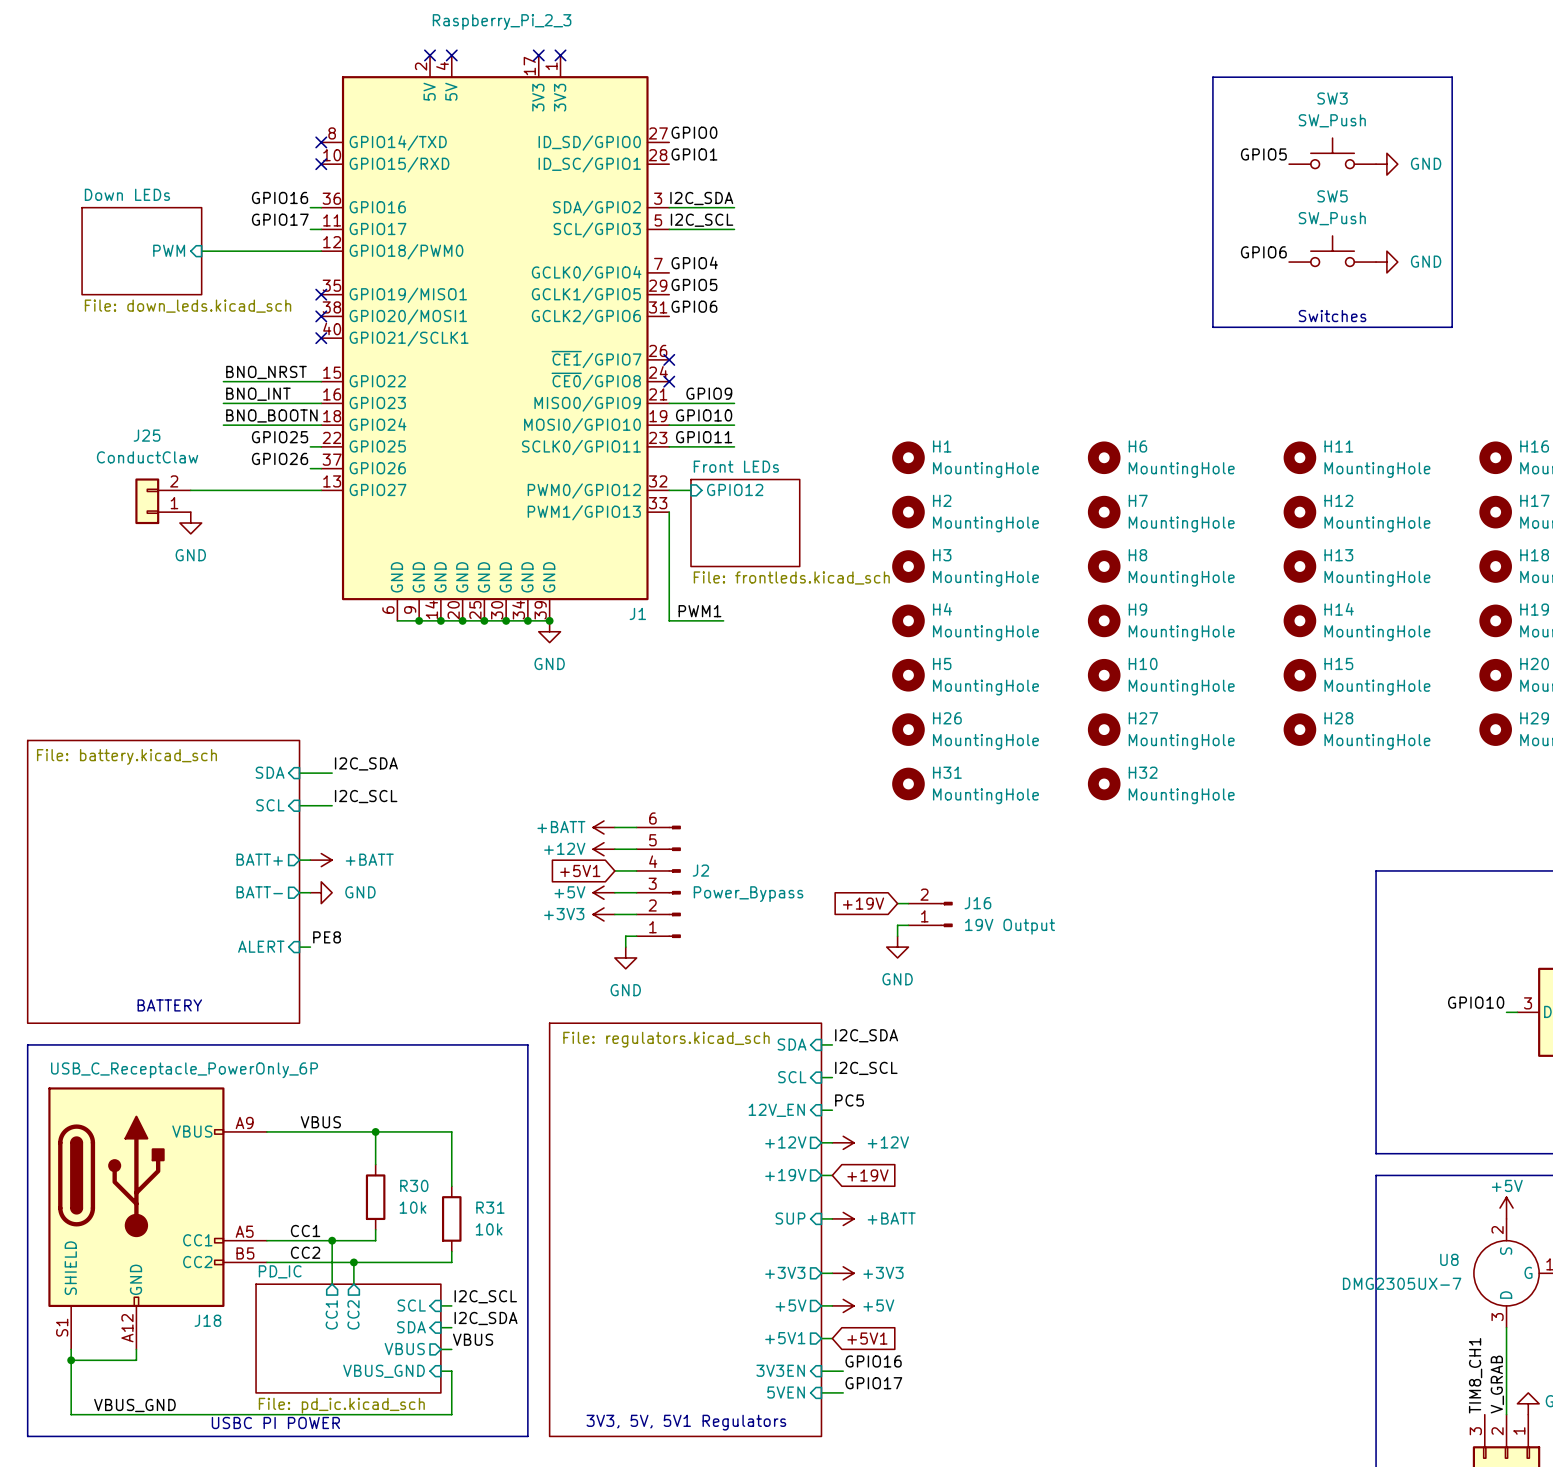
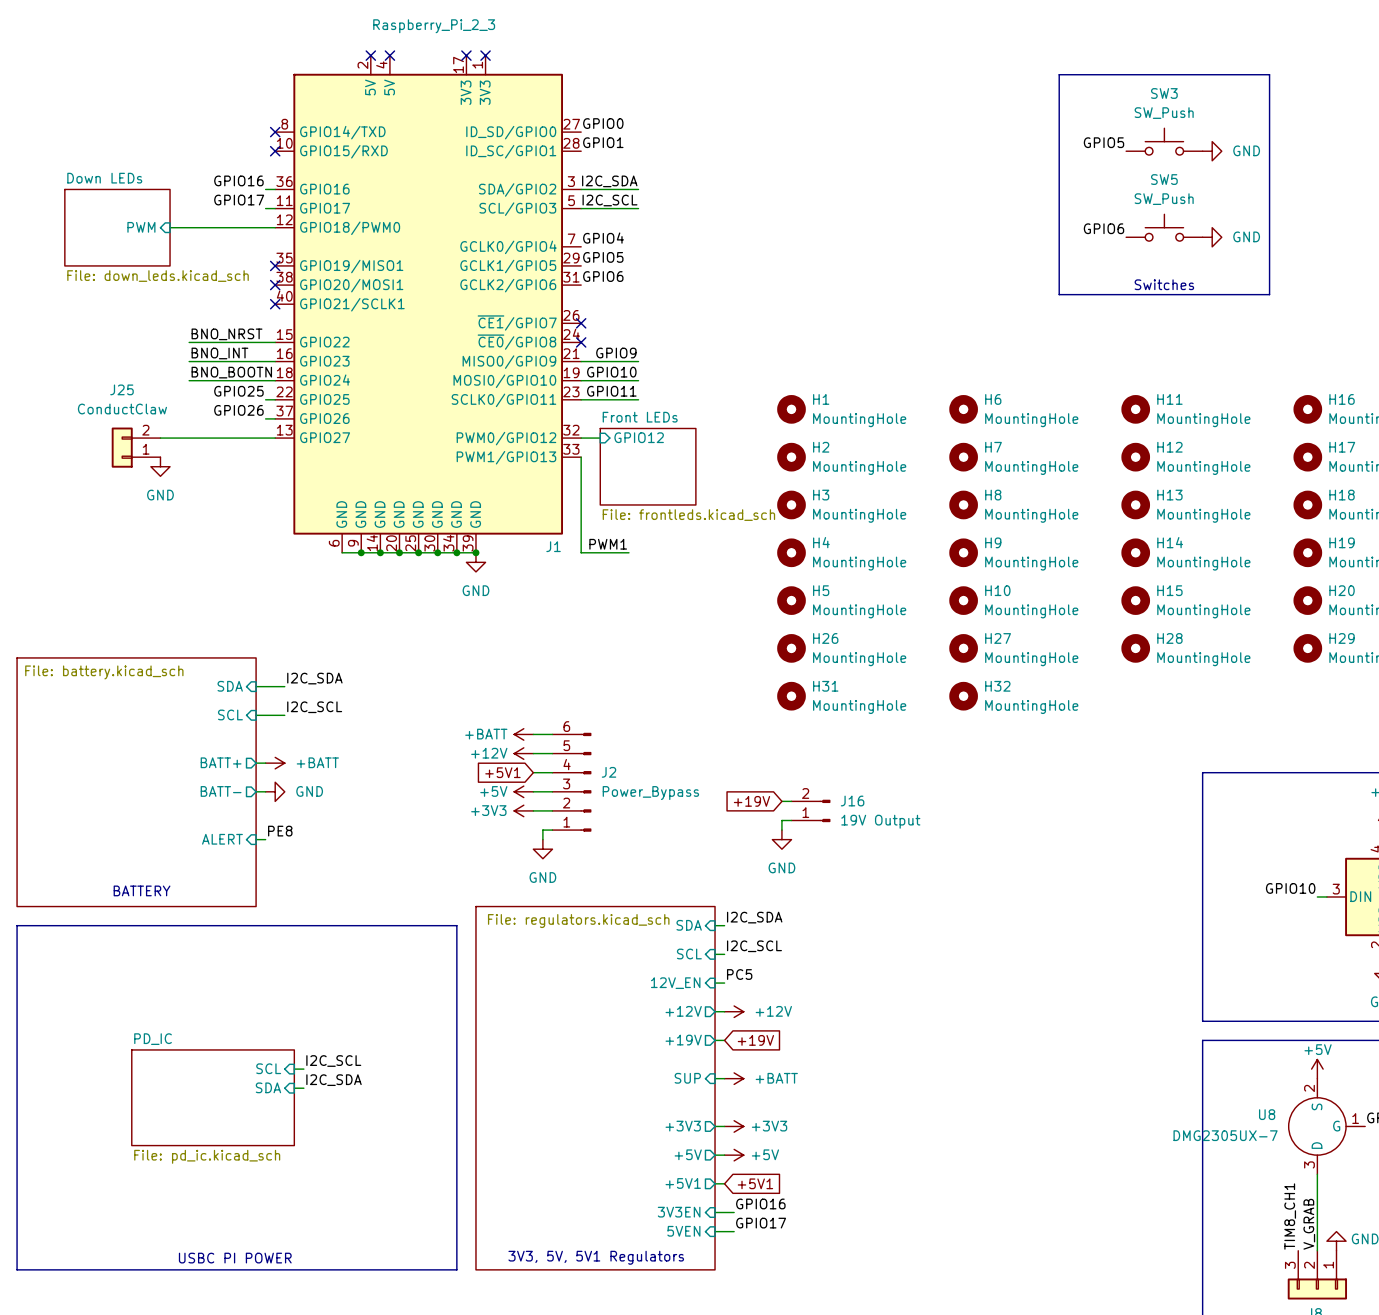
label: VBUS (320, 1122) -> none
wire: (266, 1131) (451, 1131) (451, 1186) -> none
wire: (375, 1131) (375, 1164) -> none
junction: (375, 1131) -> none
R30: 10k (375, 1197) -> none
J18: USB_C_Receptacle_PowerOnly_6P (157, 1218) -> none
R31: 10k (451, 1218) -> none
wire: (375, 1229) (375, 1240) (266, 1240) -> none
label: CC1 (305, 1230) -> none
wire: (332, 1240) (332, 1284) -> none
junction: (332, 1240) -> none
wire: (451, 1251) (451, 1262) (266, 1262) -> none
label: CC2 (305, 1252) -> none
wire: (353, 1262) (353, 1284) -> none
junction: (353, 1262) -> none
label position: I2C_SCL (485, 1296) -> I2C_SCL (333, 1061)
sheet pin position: SCL (411, 1305) -> SCL (268, 1068)
wire: (440, 1305) (451, 1305) -> (294, 1069) (303, 1069)
sheet pin: CC1 (331, 1314) -> none
sheet pin: CC2 (353, 1314) -> none
label position: I2C_SDA (486, 1318) -> I2C_SDA (334, 1080)
sheet pin position: SDA (411, 1327) -> SDA (268, 1087)
wire: (440, 1327) (451, 1327) -> (294, 1088) (303, 1088)
sheet PD_IC position: (348, 1338) -> (213, 1097)
label: VBUS (473, 1339) -> none
wire: (71, 1349) (71, 1414) (451, 1414) (451, 1371) (440, 1371) -> none
wire: (136, 1349) (136, 1360) (71, 1360) -> none
sheet pin: VBUS (404, 1349) -> none
wire: (440, 1349) (451, 1349) -> none
junction: (71, 1360) -> none
sheet pin: VBUS_GND (384, 1371) -> none
label: VBUS_GND (134, 1405) -> none

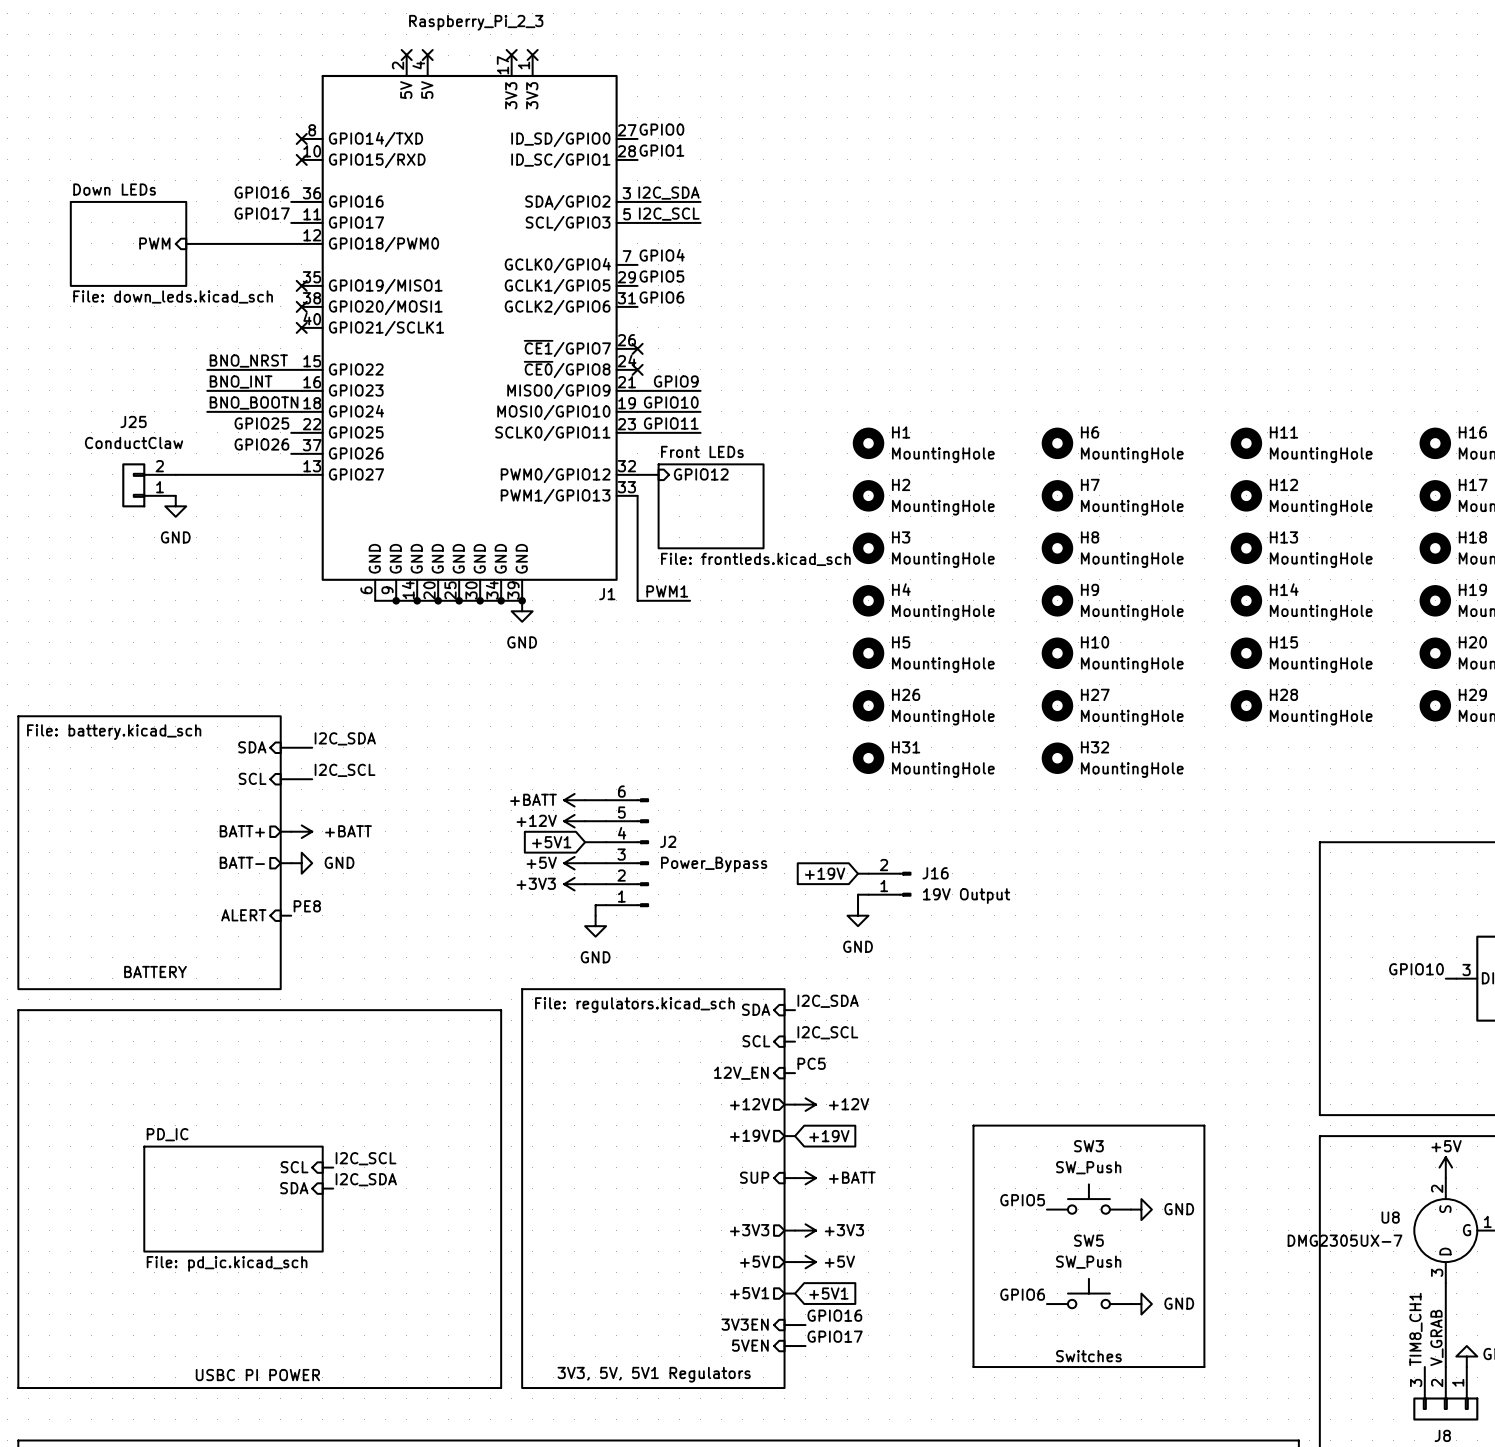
line: (1059, 74) (1269, 74) (1269, 294) (1059, 294) (1059, 74) -> none
SW3 position: (1164, 141) -> (1088, 1199)
label: GPIO5 (1103, 142) -> none
power symbol: GND (1212, 151) -> none
SW5 position: (1164, 227) -> (1088, 1293)
label: GPIO6 (1103, 228) -> none
power symbol: GND (1212, 237) -> none
text: Switches (1164, 284) -> none
line: none -> (973, 1125) (1204, 1125) (1204, 1367) (973, 1367) (973, 1125)
label: none -> GPIO5 (1022, 1200)
power symbol: none -> GND (1141, 1209)
label: none -> GPIO6 (1022, 1294)
power symbol: none -> GND (1141, 1304)
text: none -> Switches (1088, 1356)

